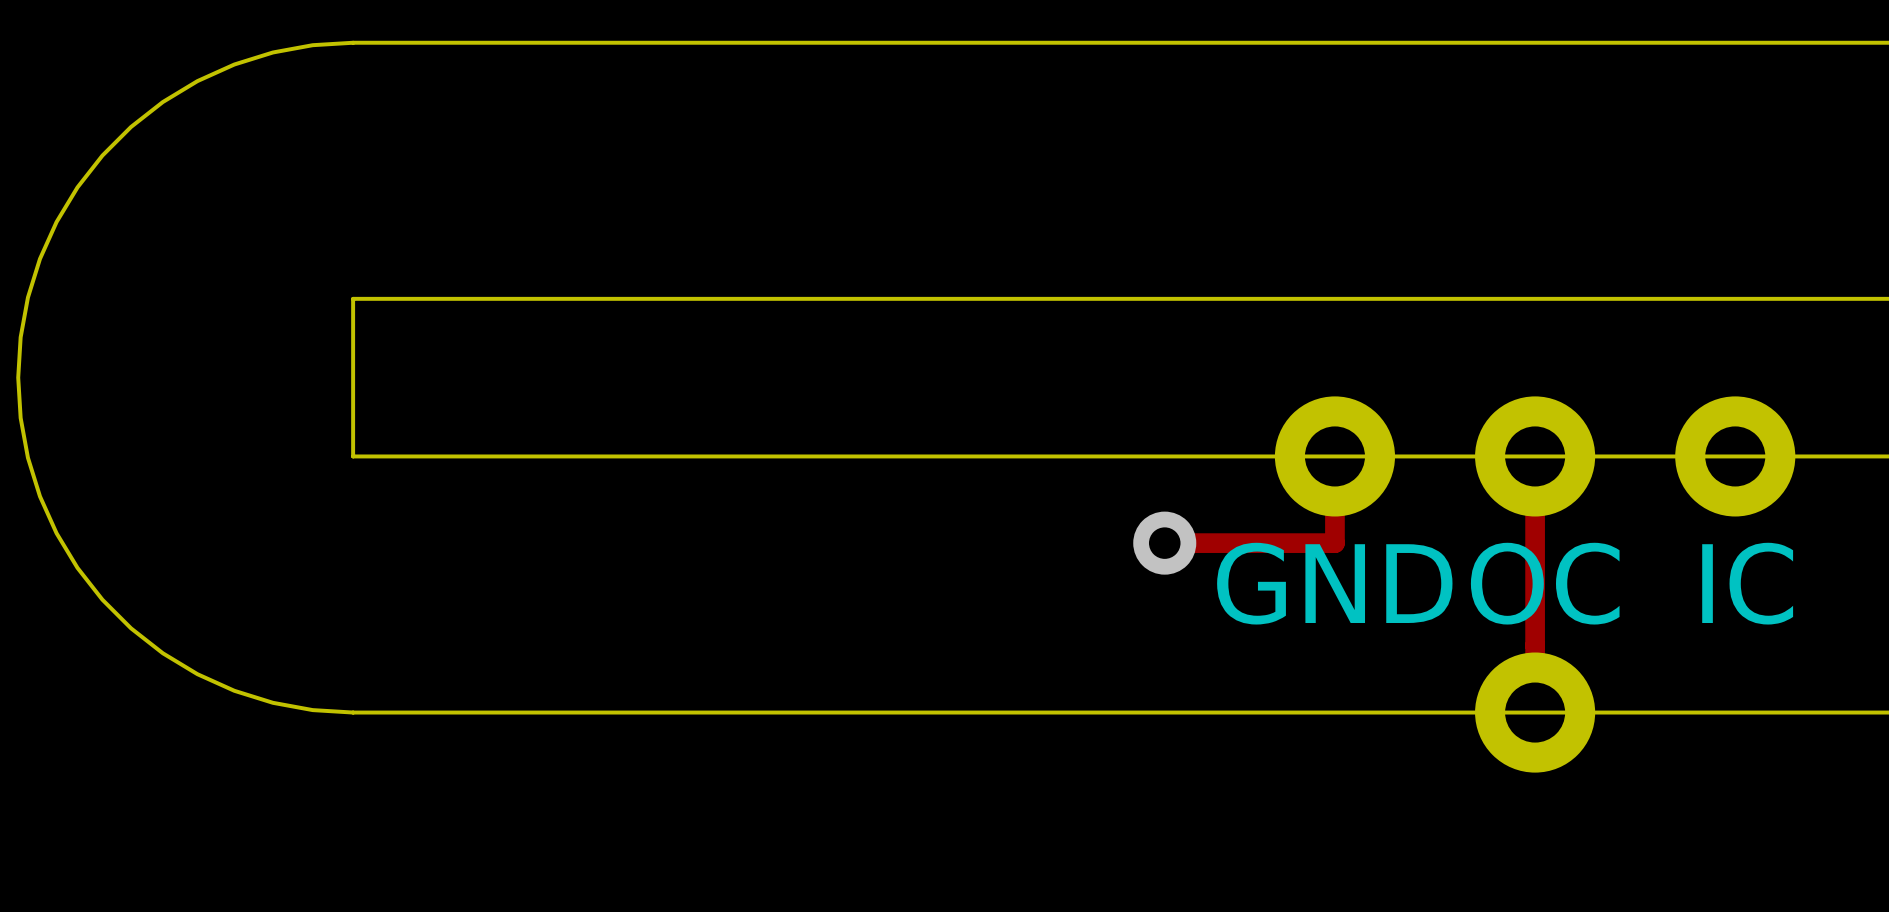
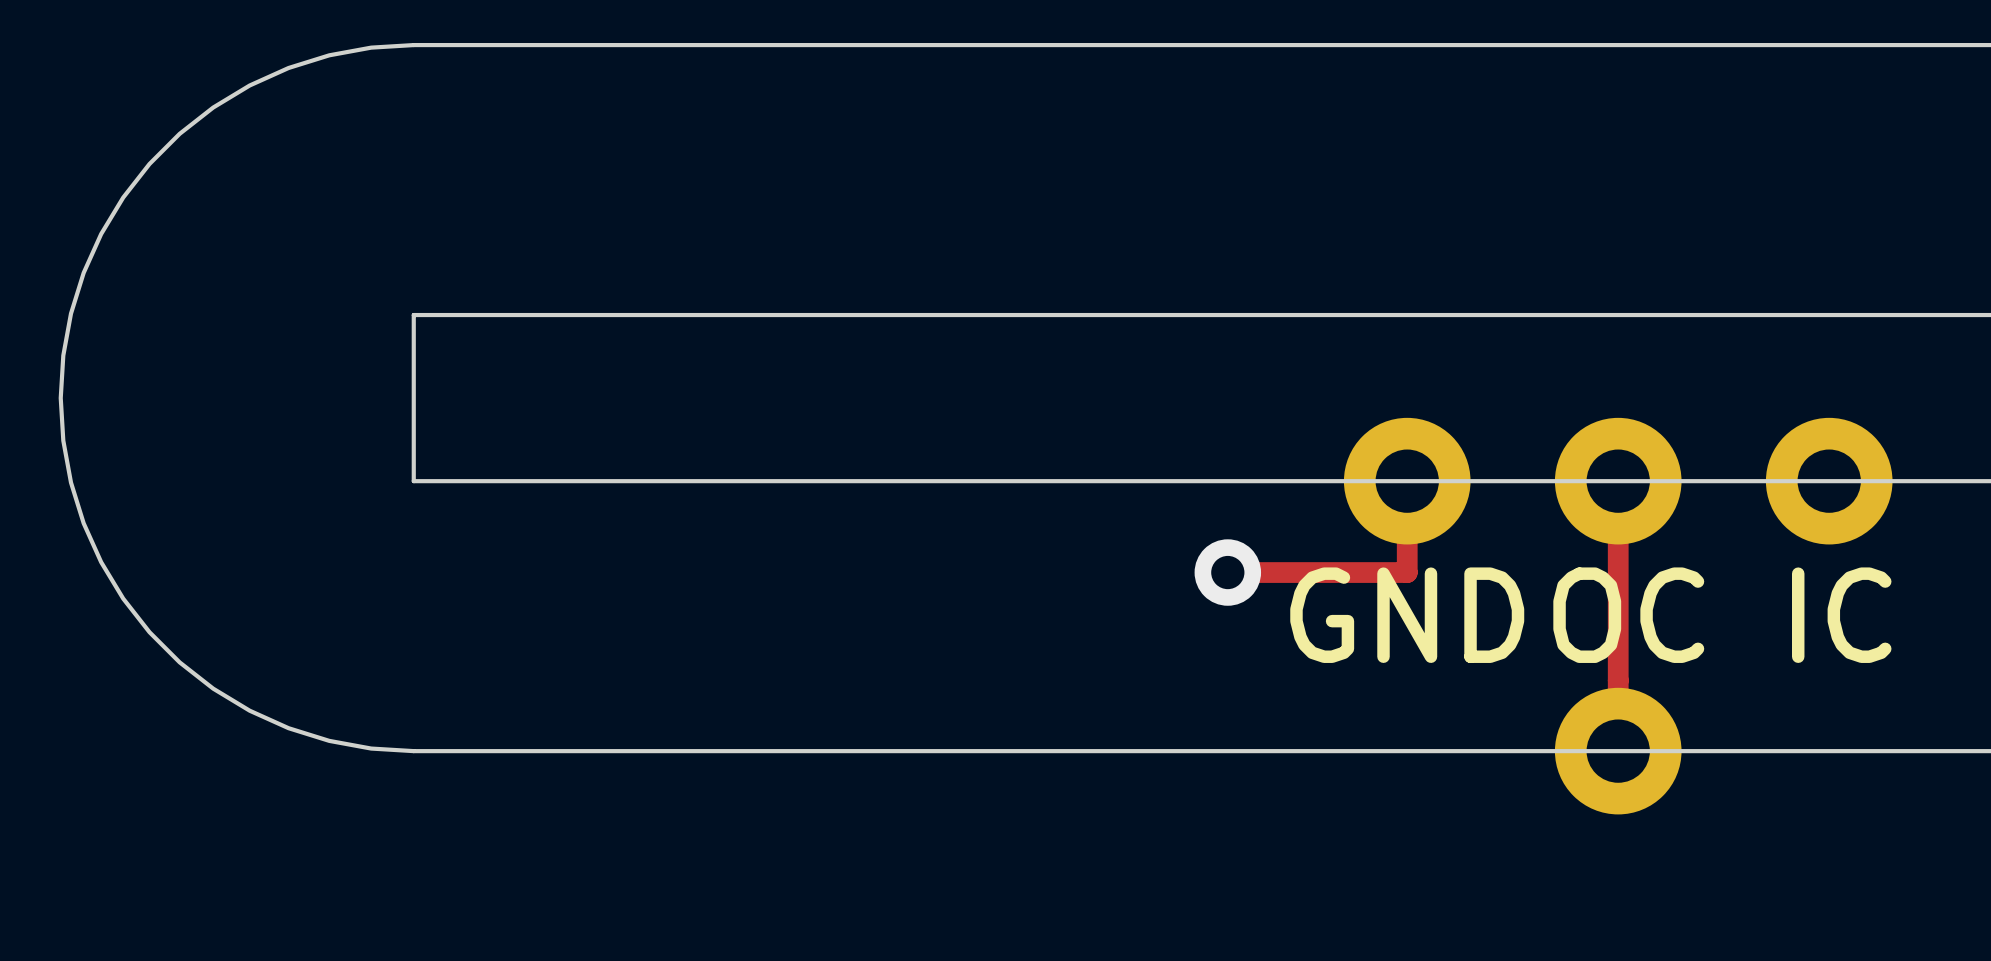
board edge: (392, 42) (312, 45) (272, 52) (234, 64) (197, 81) (162, 102) (131, 126) (102, 155) (77, 187) (56, 222) (39, 258) (27, 297) (20, 337) (18, 377) (20, 418) (27, 457) (39, 496) (56, 533) (77, 567) (102, 599) (131, 628) (162, 653) (197, 674) (234, 690) (272, 702) (312, 710) (392, 712) -> (413, 45) (371, 47) (329, 55) (288, 68) (249, 85) (213, 107) (179, 133) (149, 163) (123, 197) (101, 234) (83, 272) (70, 313) (63, 355) (60, 398) (63, 440) (70, 482) (83, 523) (101, 562) (123, 598) (149, 632) (179, 662) (213, 688) (249, 710) (288, 728) (329, 740) (371, 748) (413, 751)
board edge: (392, 298) (353, 298) (353, 456) (392, 456) -> (413, 315) (413, 481)

